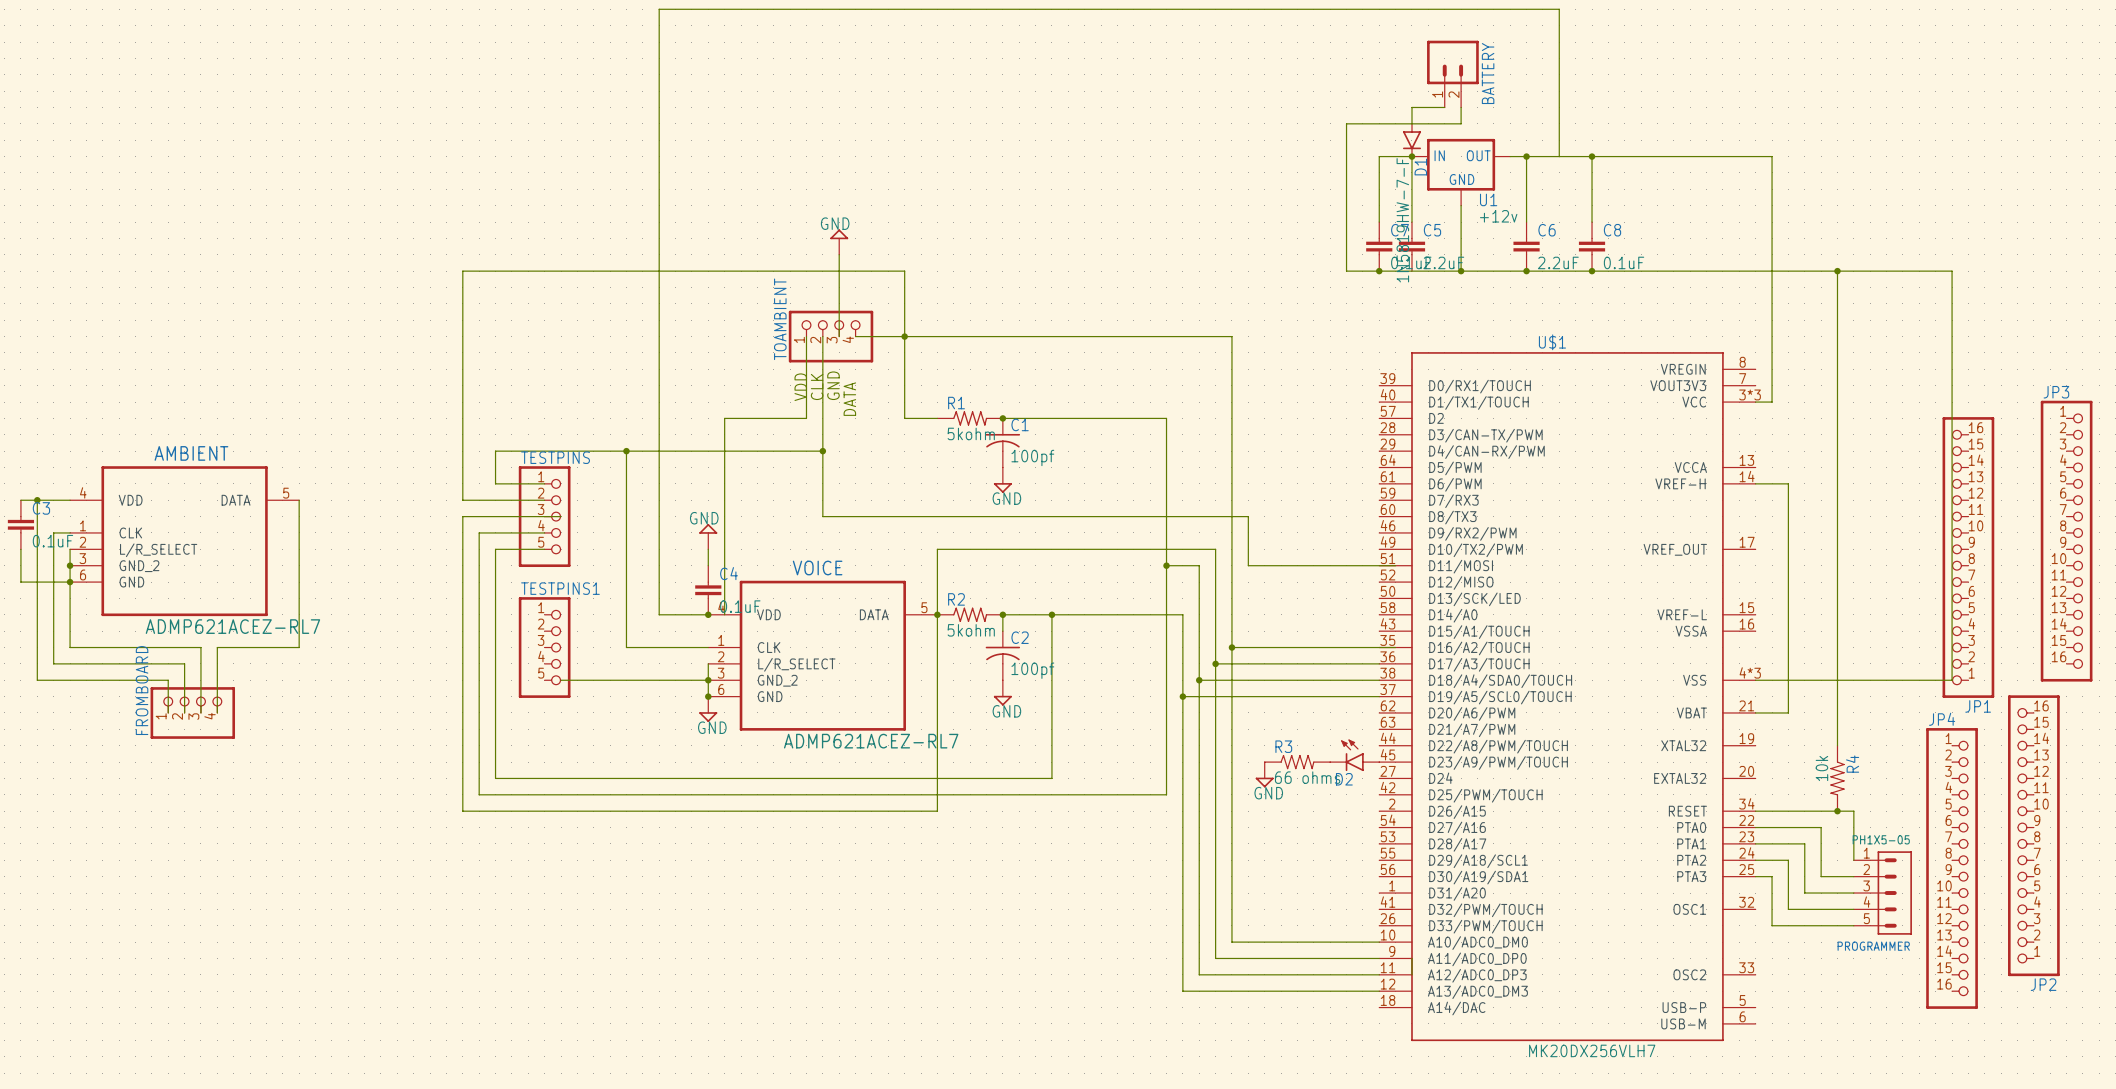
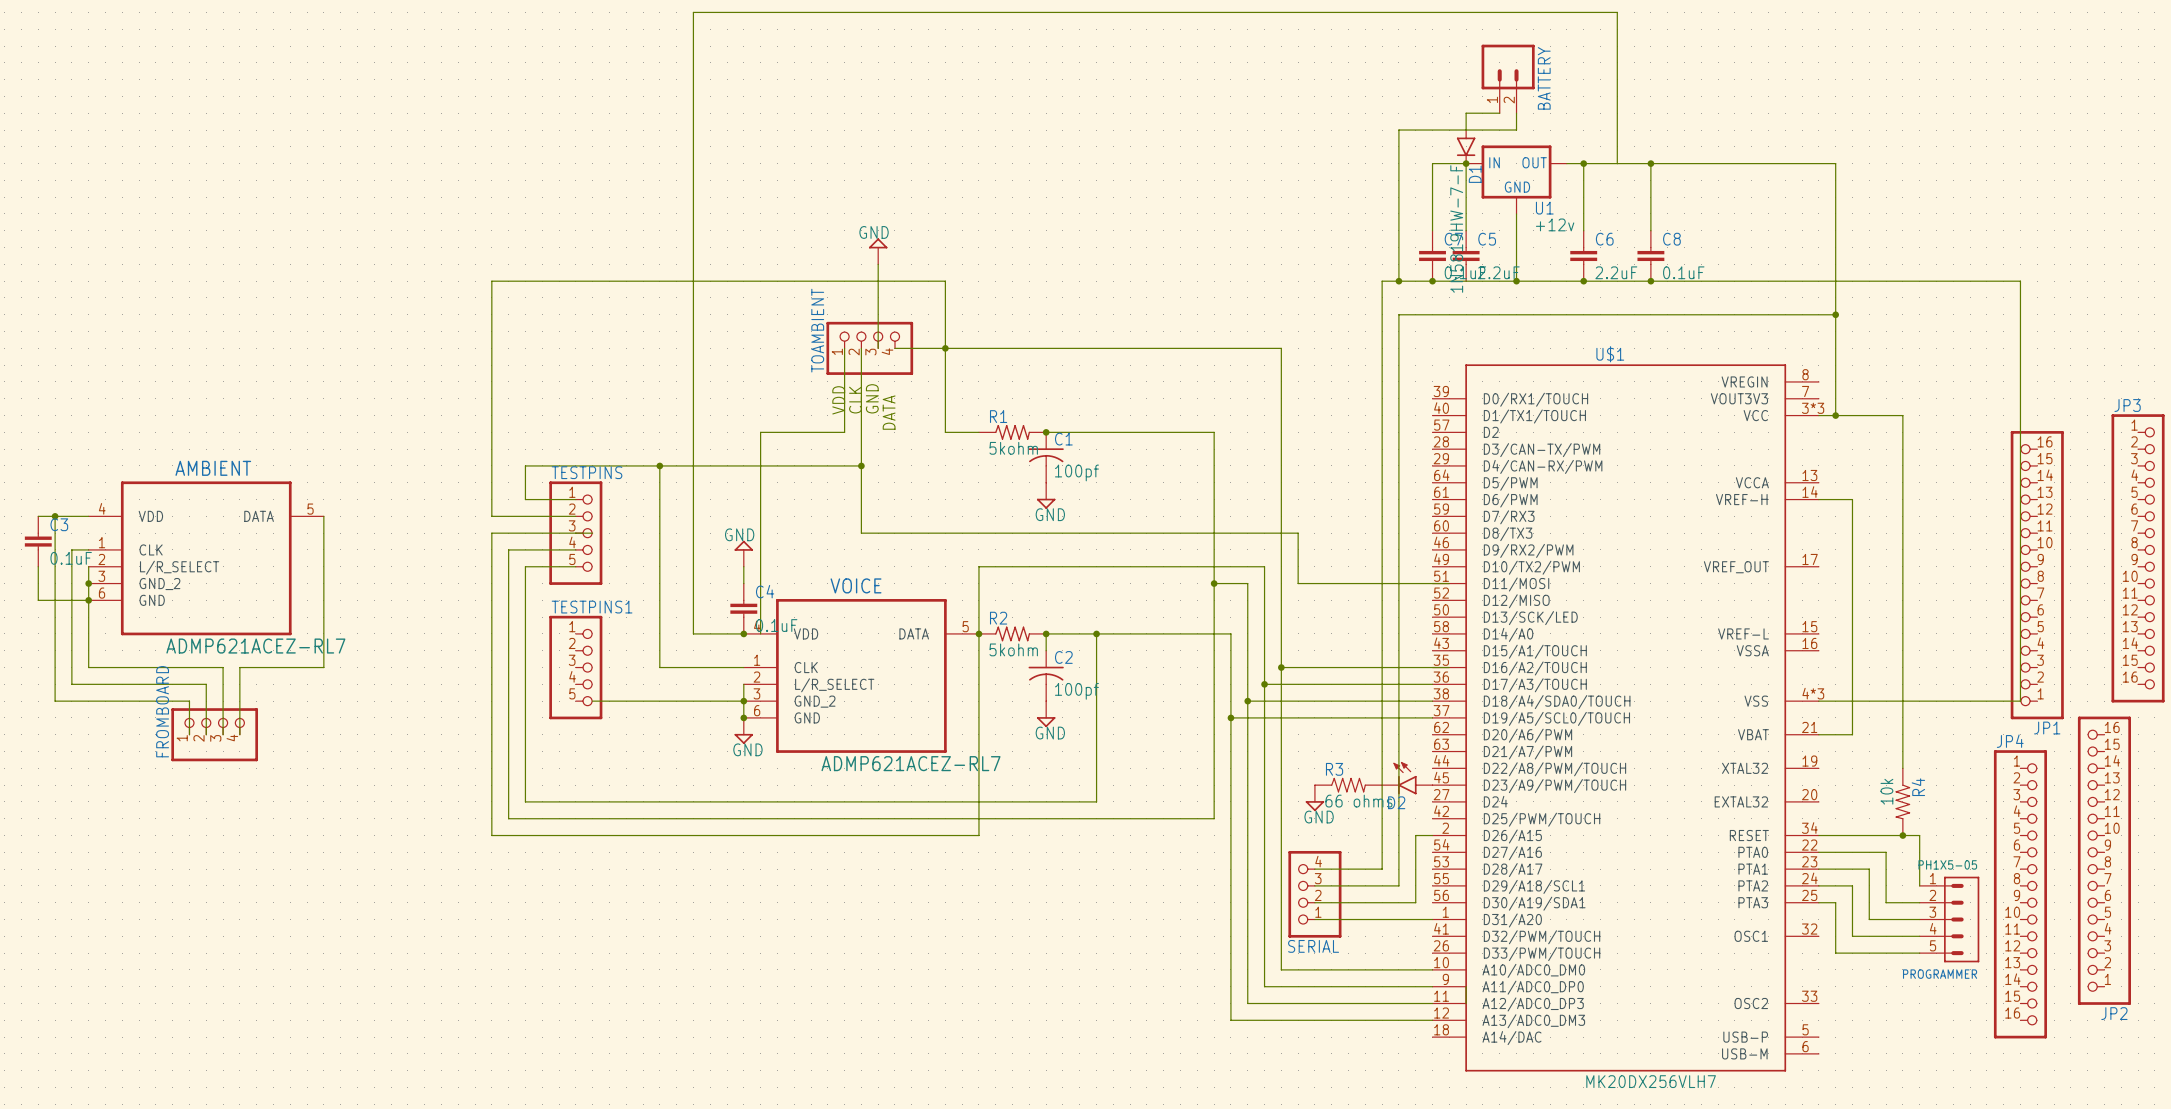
wire: none -> (1398, 281) (1382, 281) (1382, 869) (1314, 869)
junction: none -> (1398, 281)
wire: (1837, 271) (1837, 402) -> (1835, 415) (1902, 415)
junction: (1837, 271) -> none
wire: none -> (1835, 314) (1398, 314) (1398, 885) (1314, 885)
junction: none -> (1835, 314)
junction: none -> (1835, 415)
wire: none -> (1432, 835) (1415, 835) (1415, 902) (1314, 902)
SERIAL: none -> (1314, 894)
wire: none -> (1314, 919) (1432, 919)

